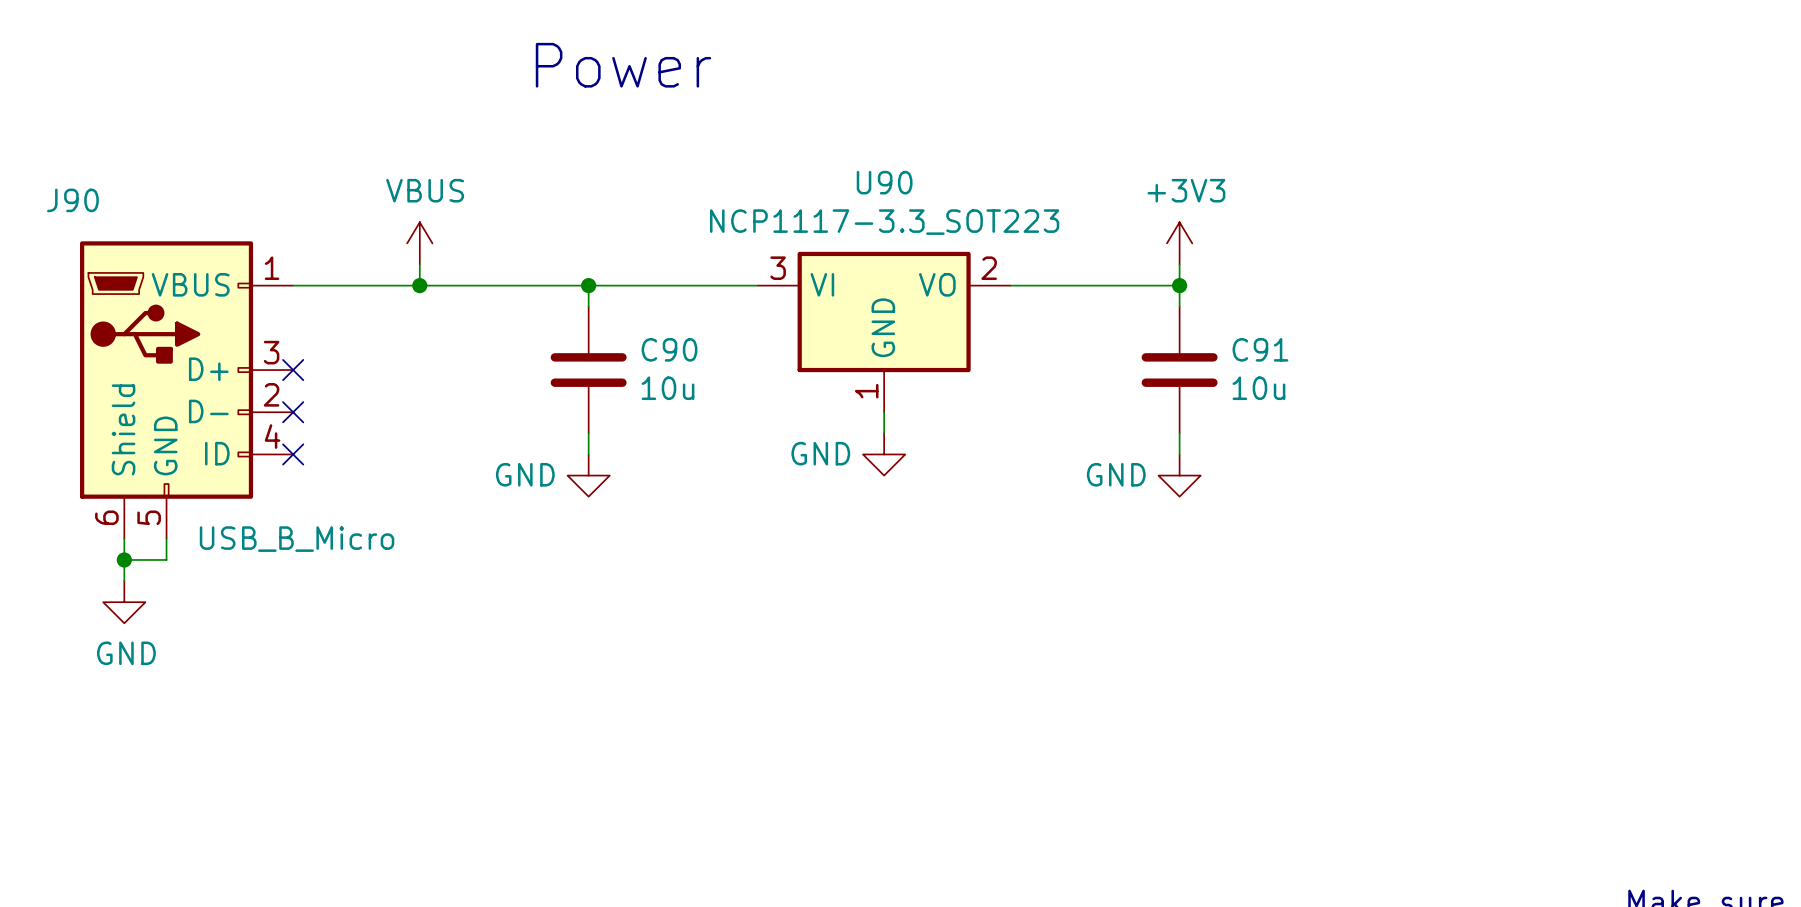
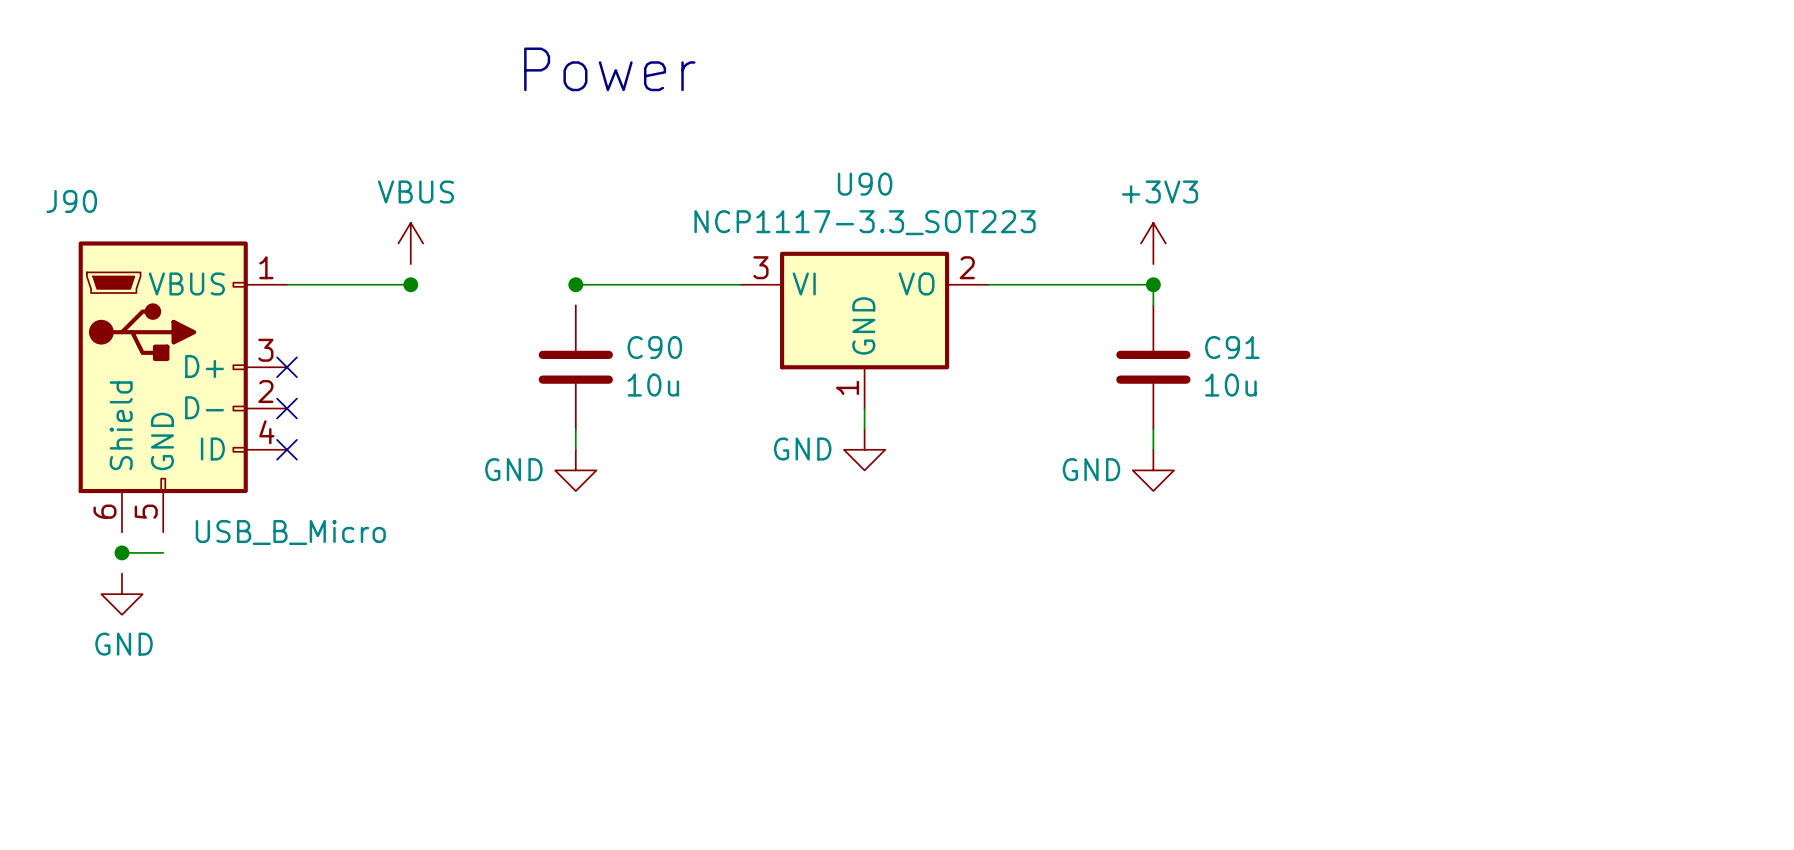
wire: (419, 264) (419, 285) (588, 285) (588, 306) -> none
wire: (1179, 264) (1179, 285) -> none
wire: (124, 538) (124, 581) -> none
wire: (166, 538) (166, 559) -> none

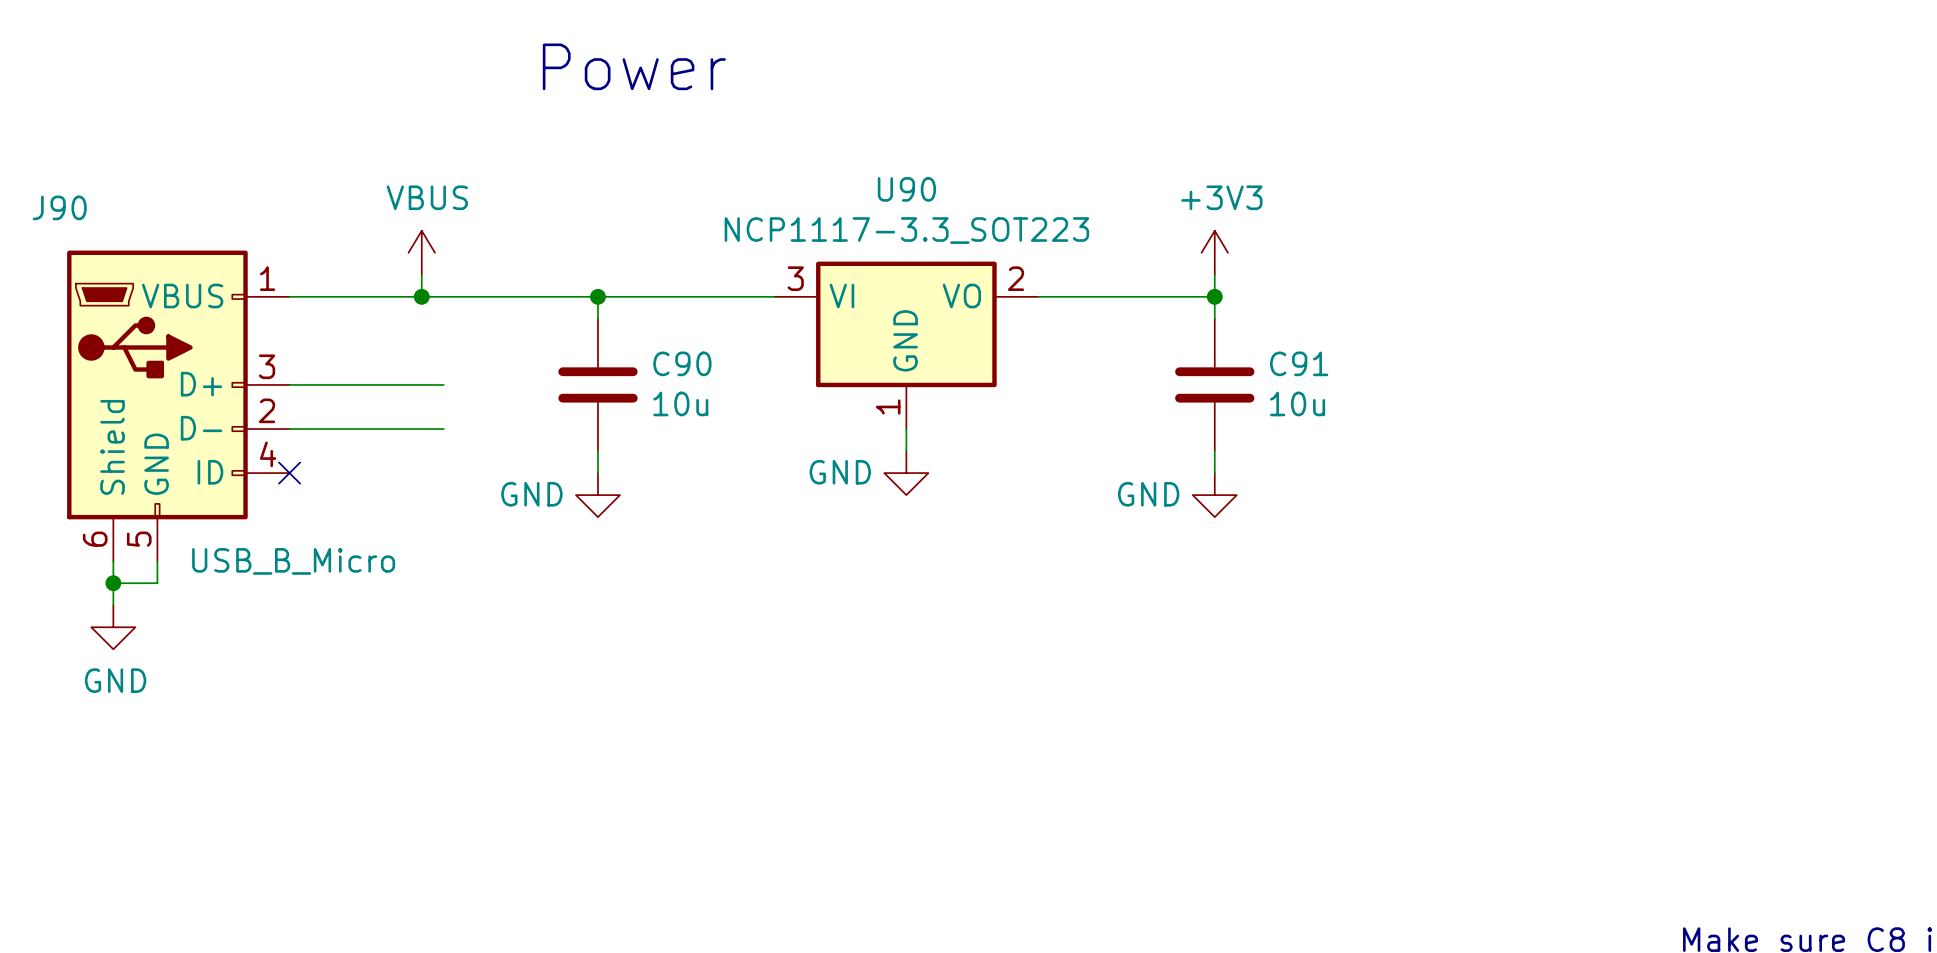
wire: none -> (421, 274) (421, 296) (597, 296) (597, 318)
wire: none -> (1214, 274) (1214, 296)
wire: none -> (289, 384) (443, 384)
no-connect mark: (287, 367) -> none
wire: none -> (289, 429) (443, 429)
no-connect mark: (287, 408) -> none
wire: none -> (113, 561) (113, 605)
wire: none -> (157, 561) (157, 583)

